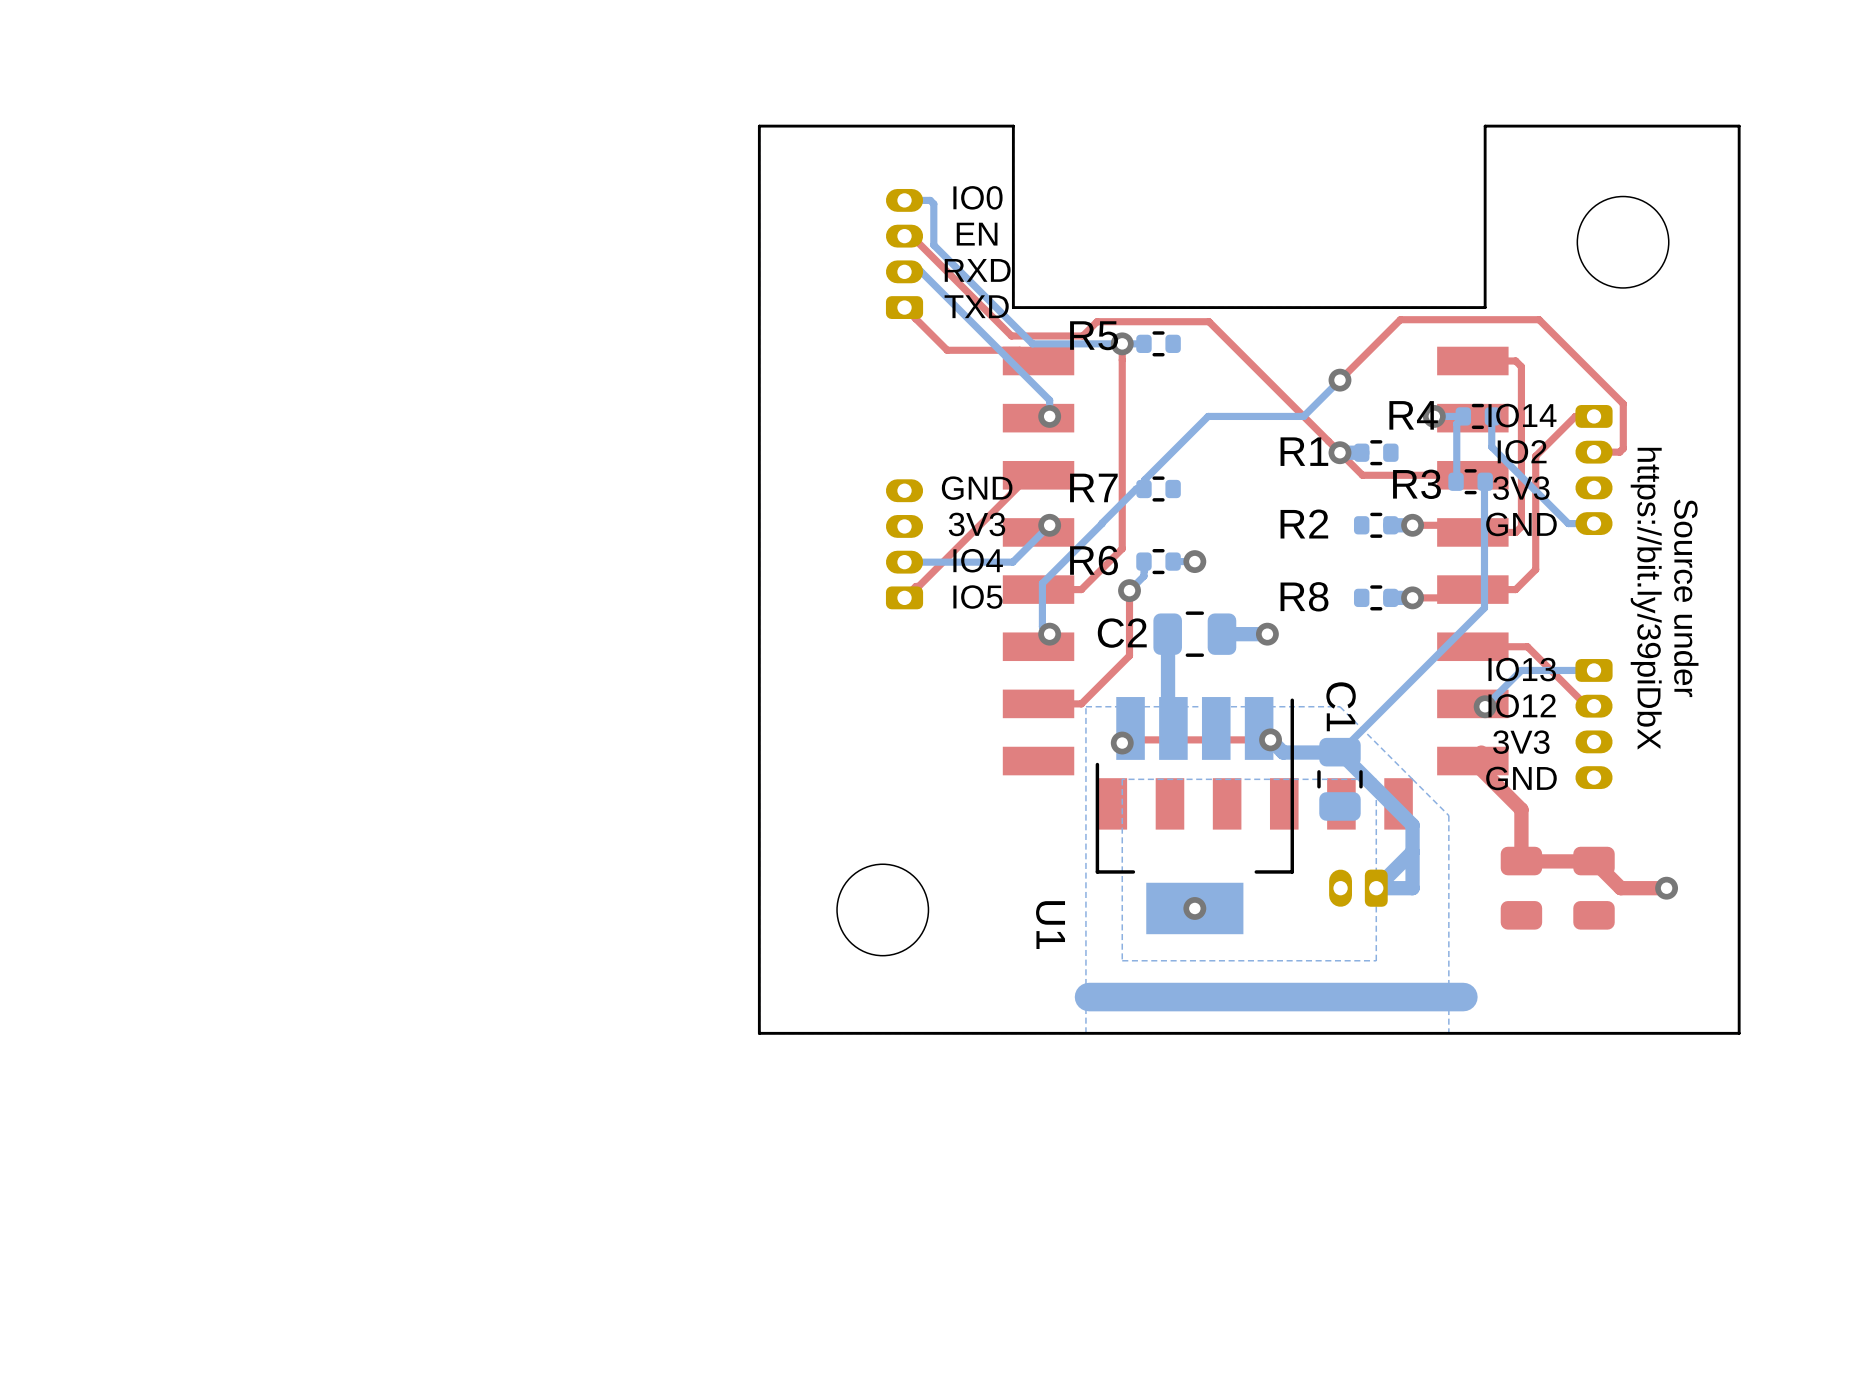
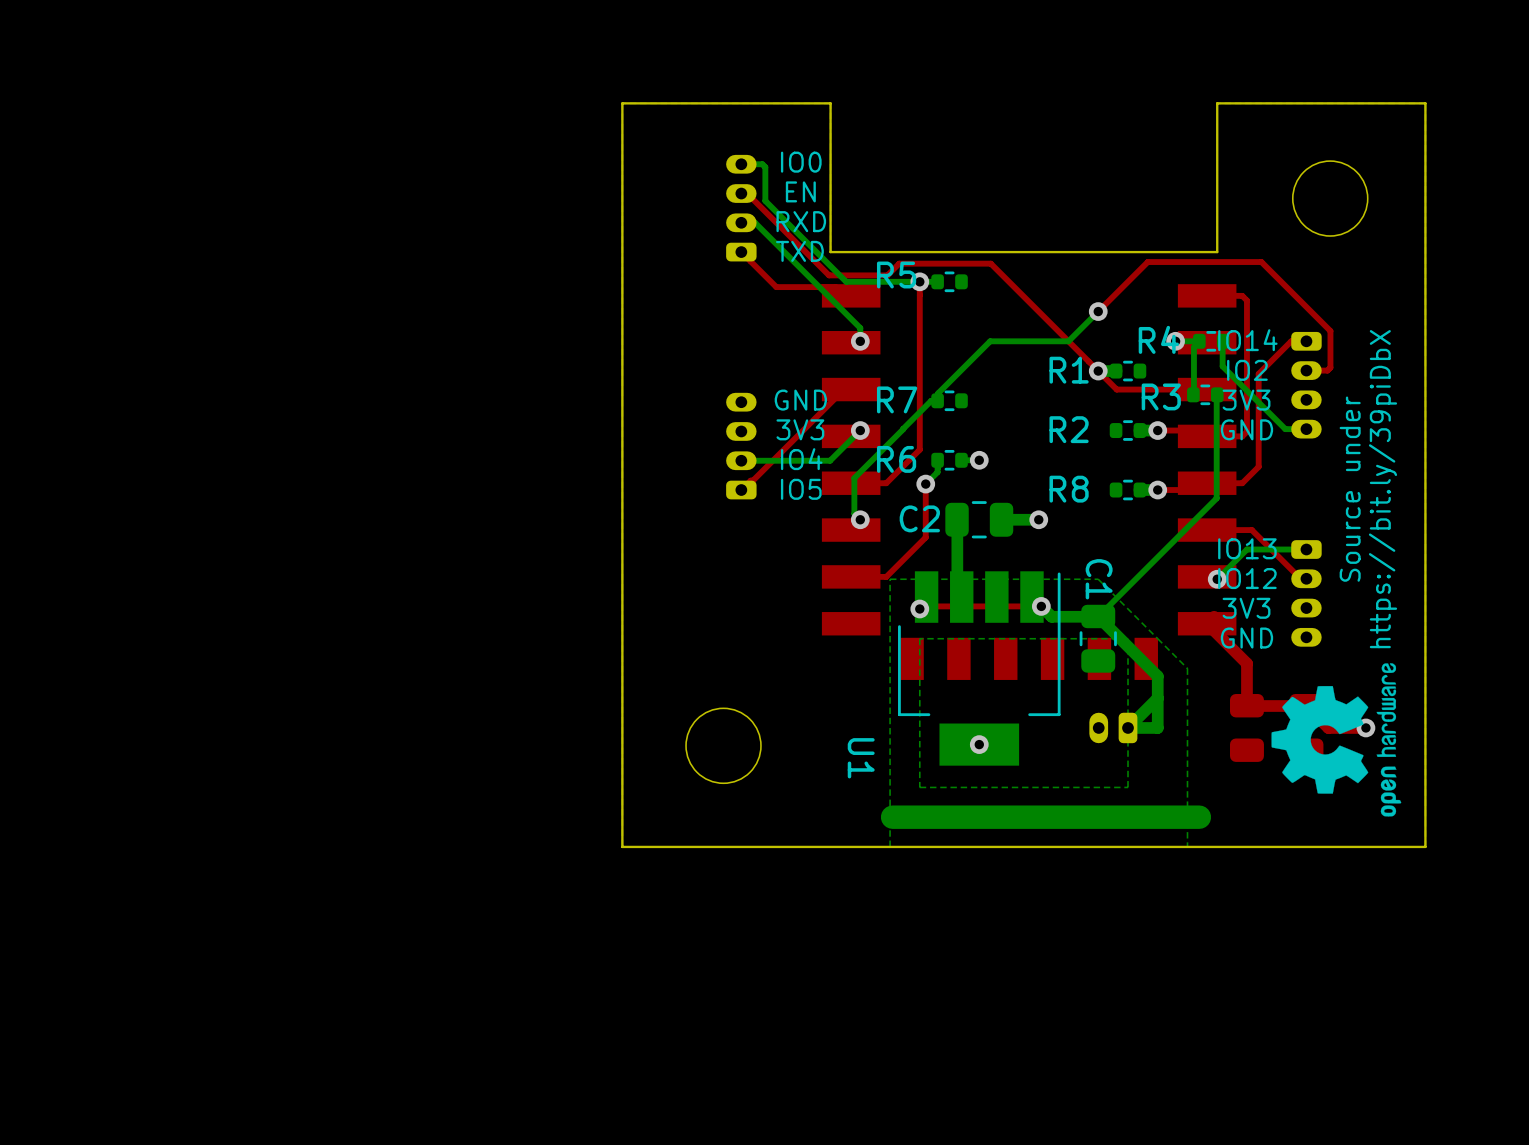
text: https://bit.ly/39piDbX (1646, 598) -> Source under (1350, 489)
text: Source under (1686, 598) -> https://bit.ly/39piDbX (1383, 489)
drawing: none -> [1271, 663, 1402, 817]

